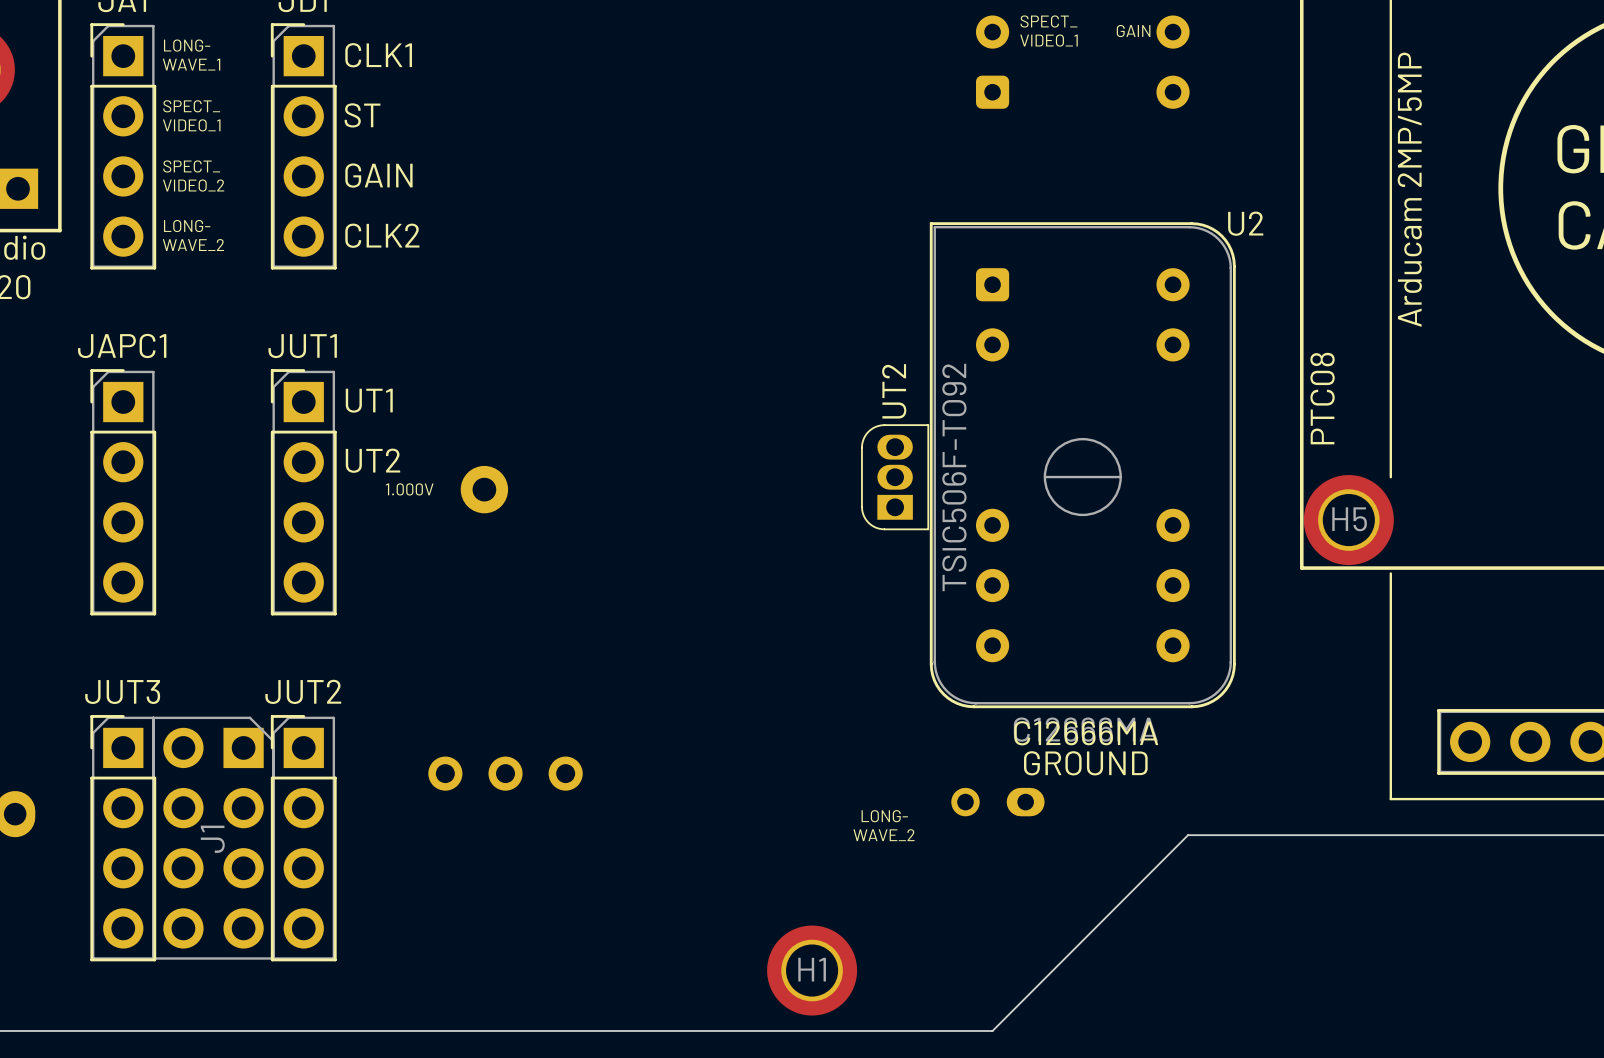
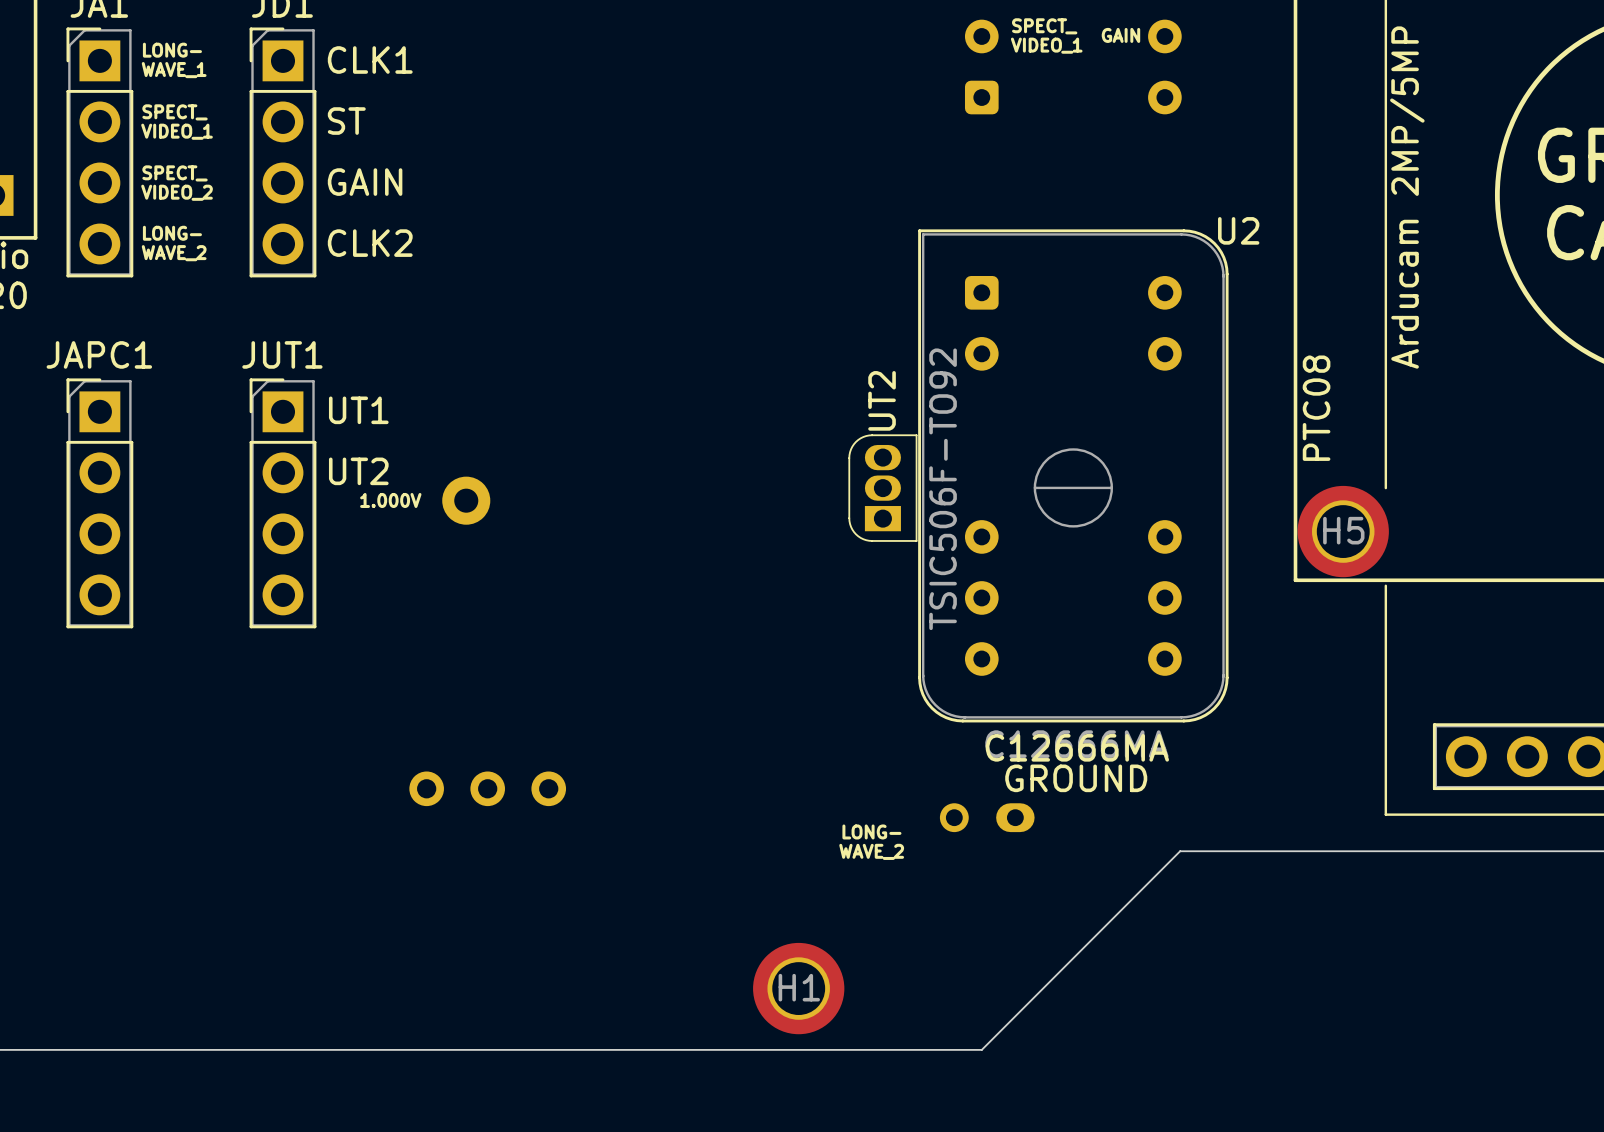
JUT3: (123, 838) -> none
J1: (213, 838) -> none
JUT2: (303, 838) -> none

